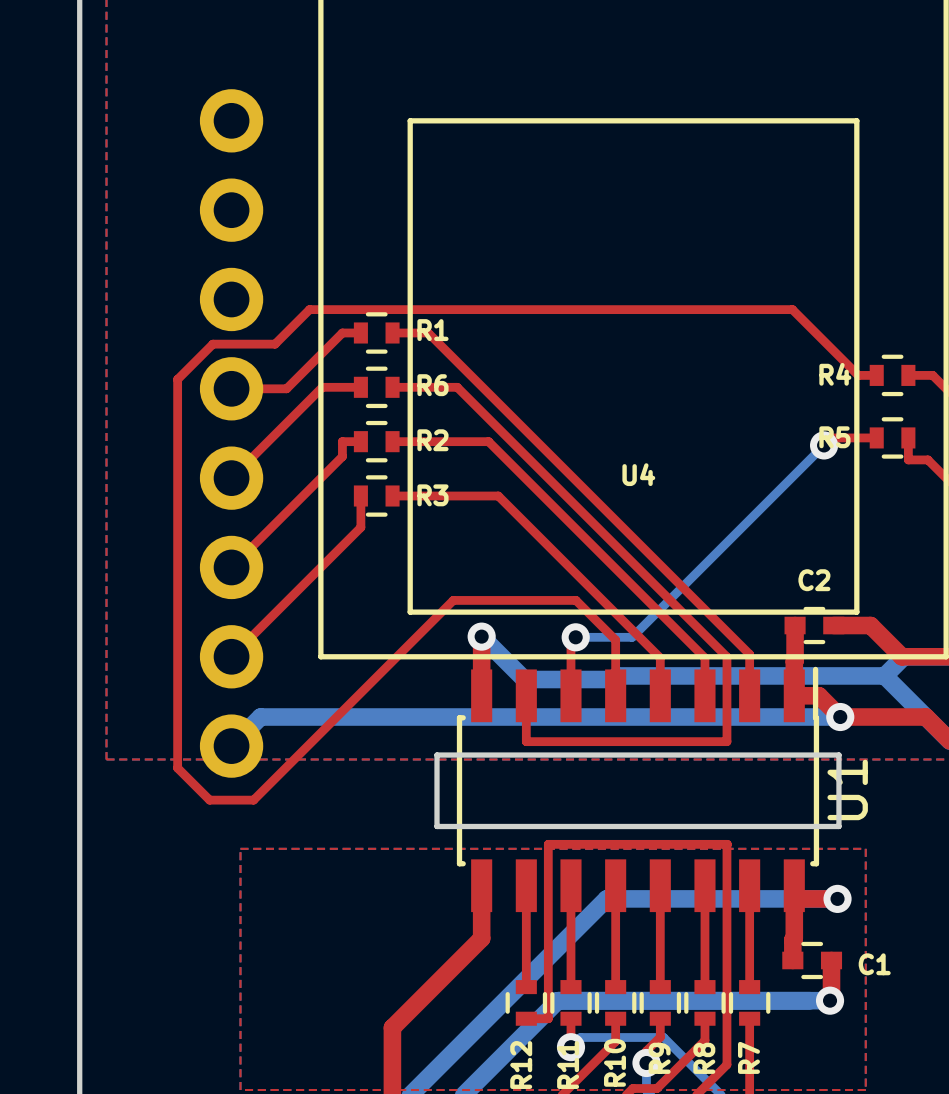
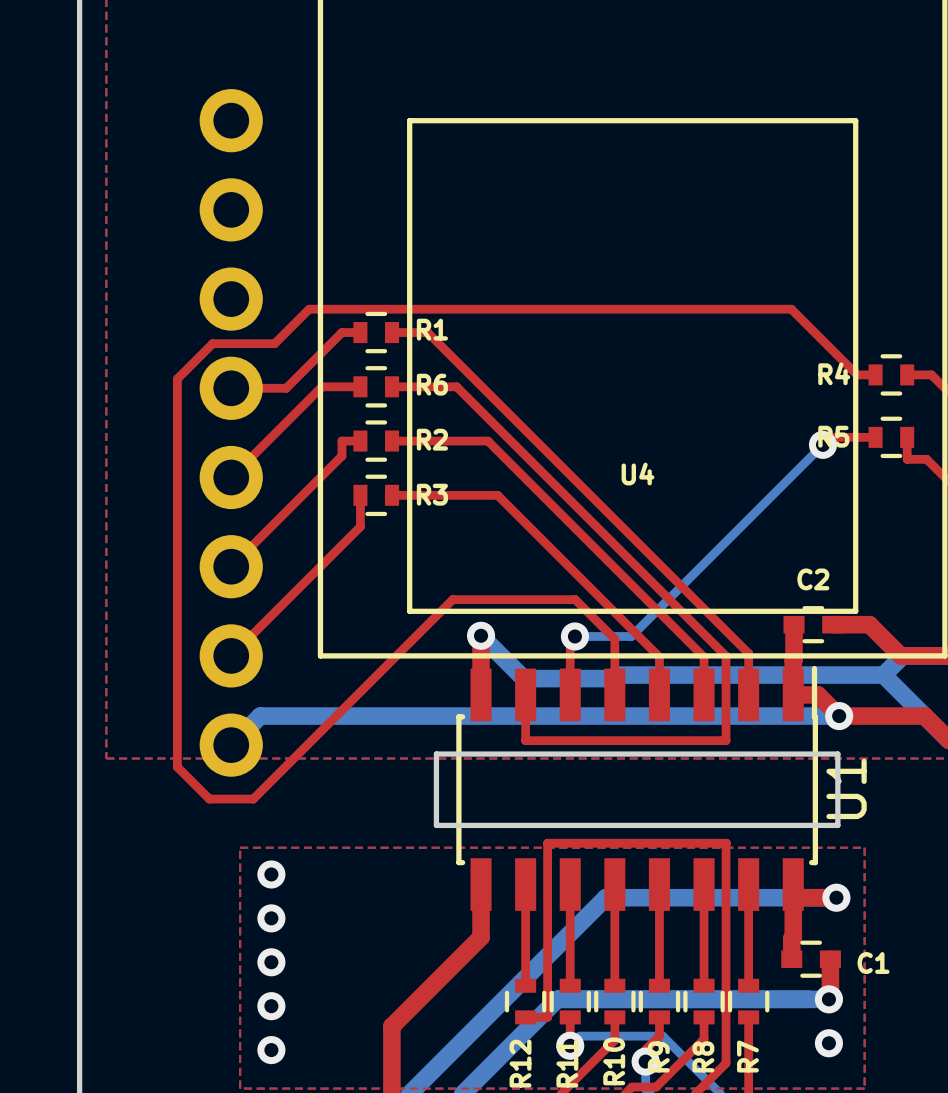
via: none -> (271, 874)
via: none -> (271, 918)
via: none -> (271, 962)
via: none -> (271, 1006)
via: none -> (828, 1043)
via: none -> (271, 1050)

